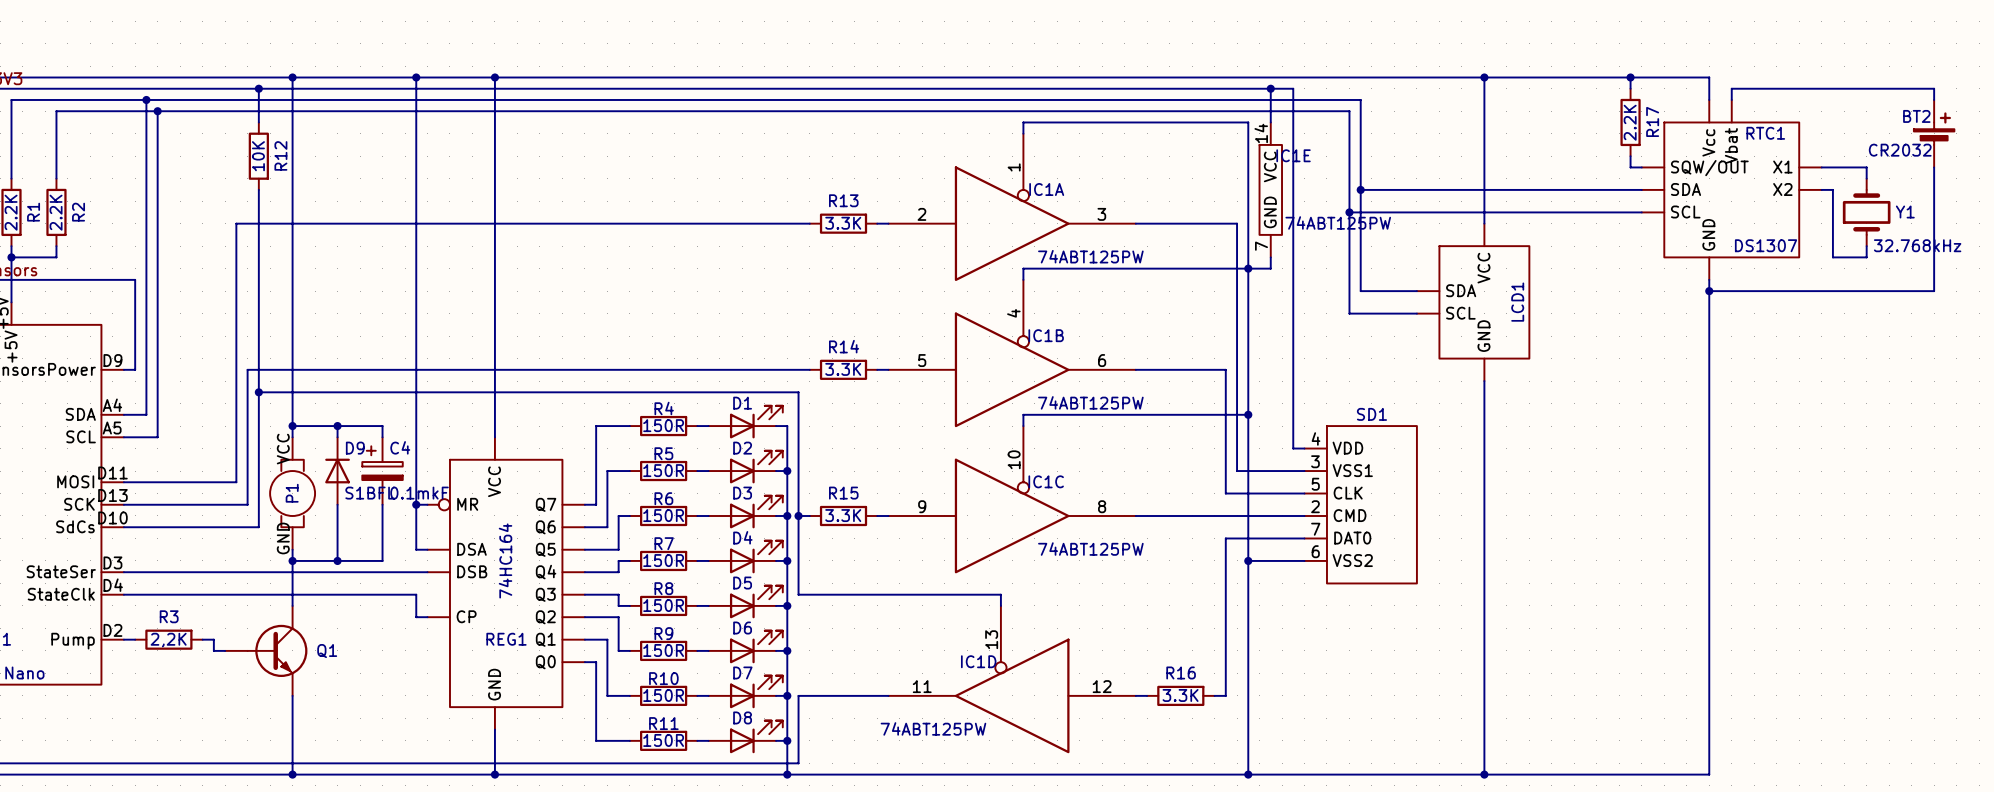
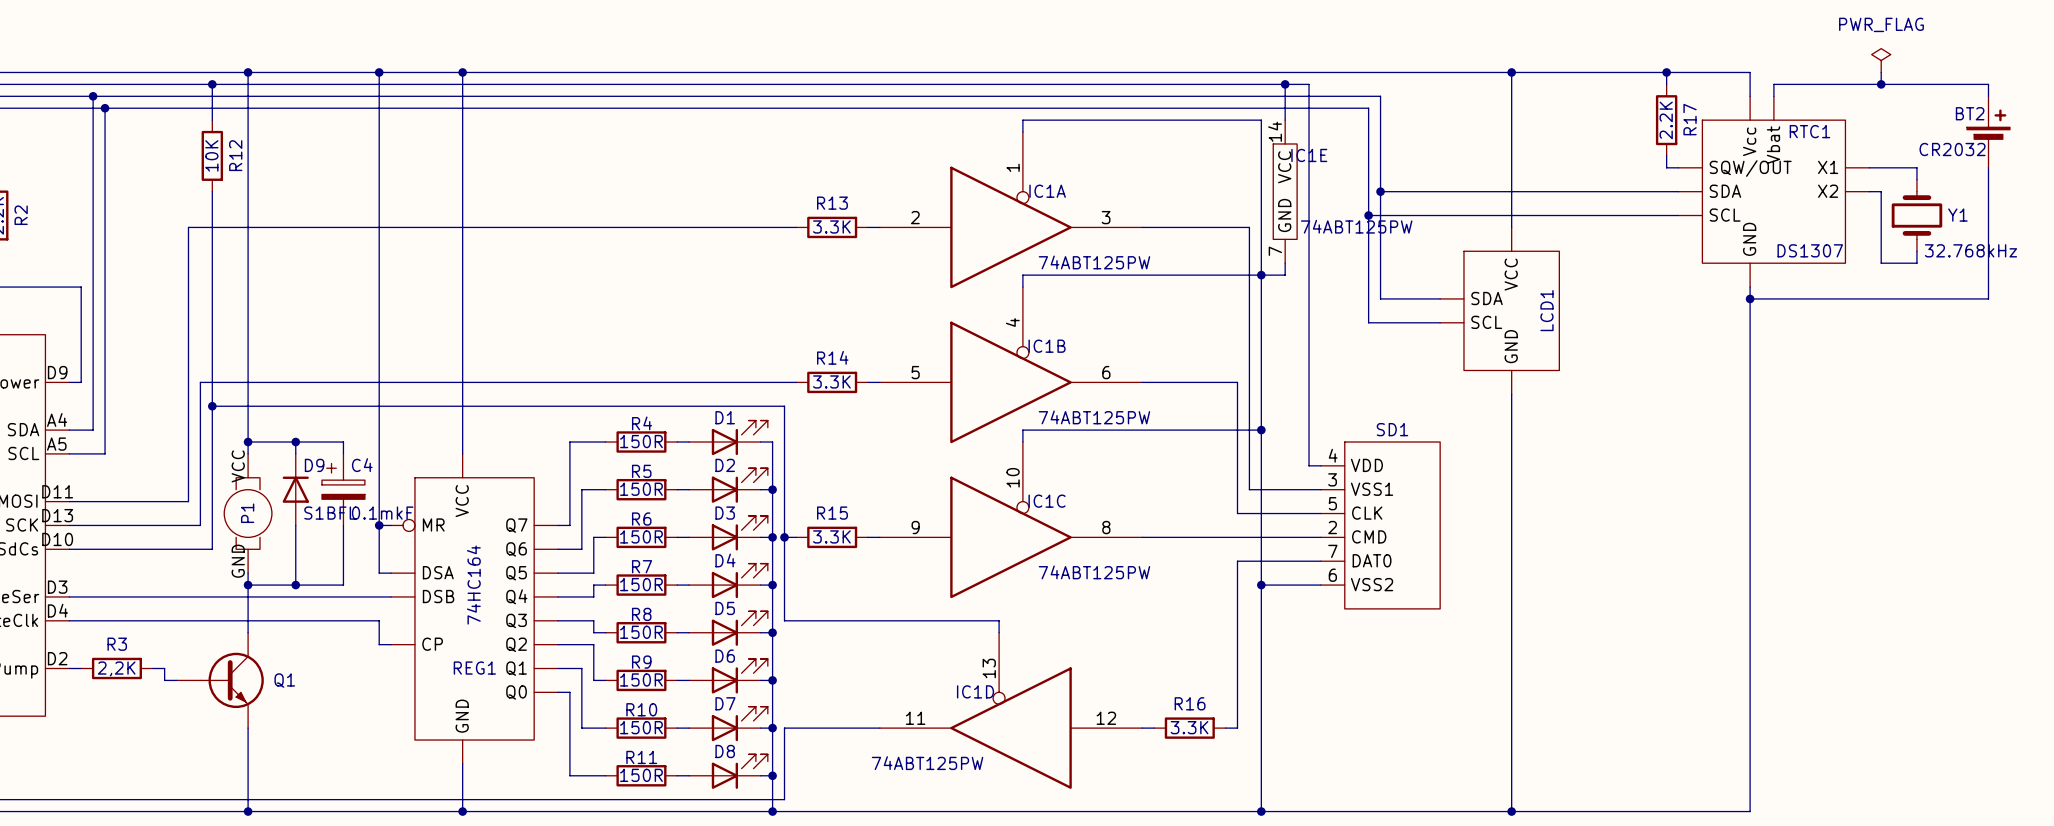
power symbol: none -> PWR_FLAG (1881, 60)
wire: none -> (1881, 72) (1881, 84)
junction: none -> (1881, 84)

